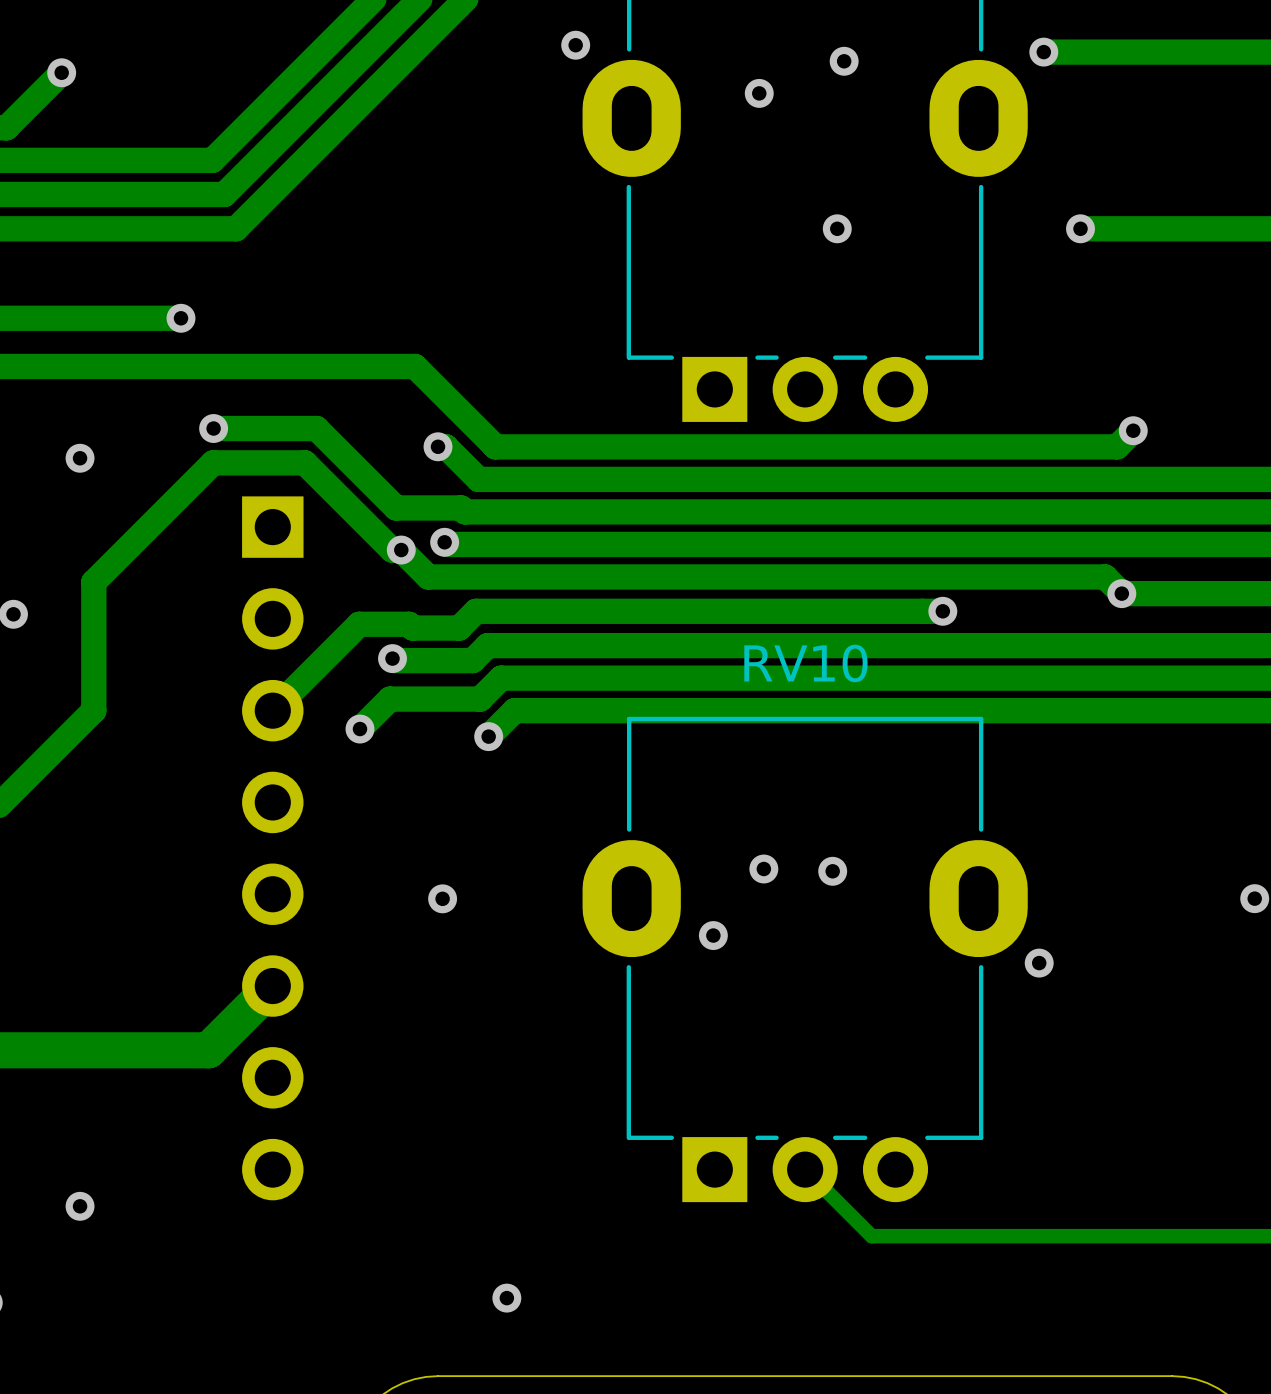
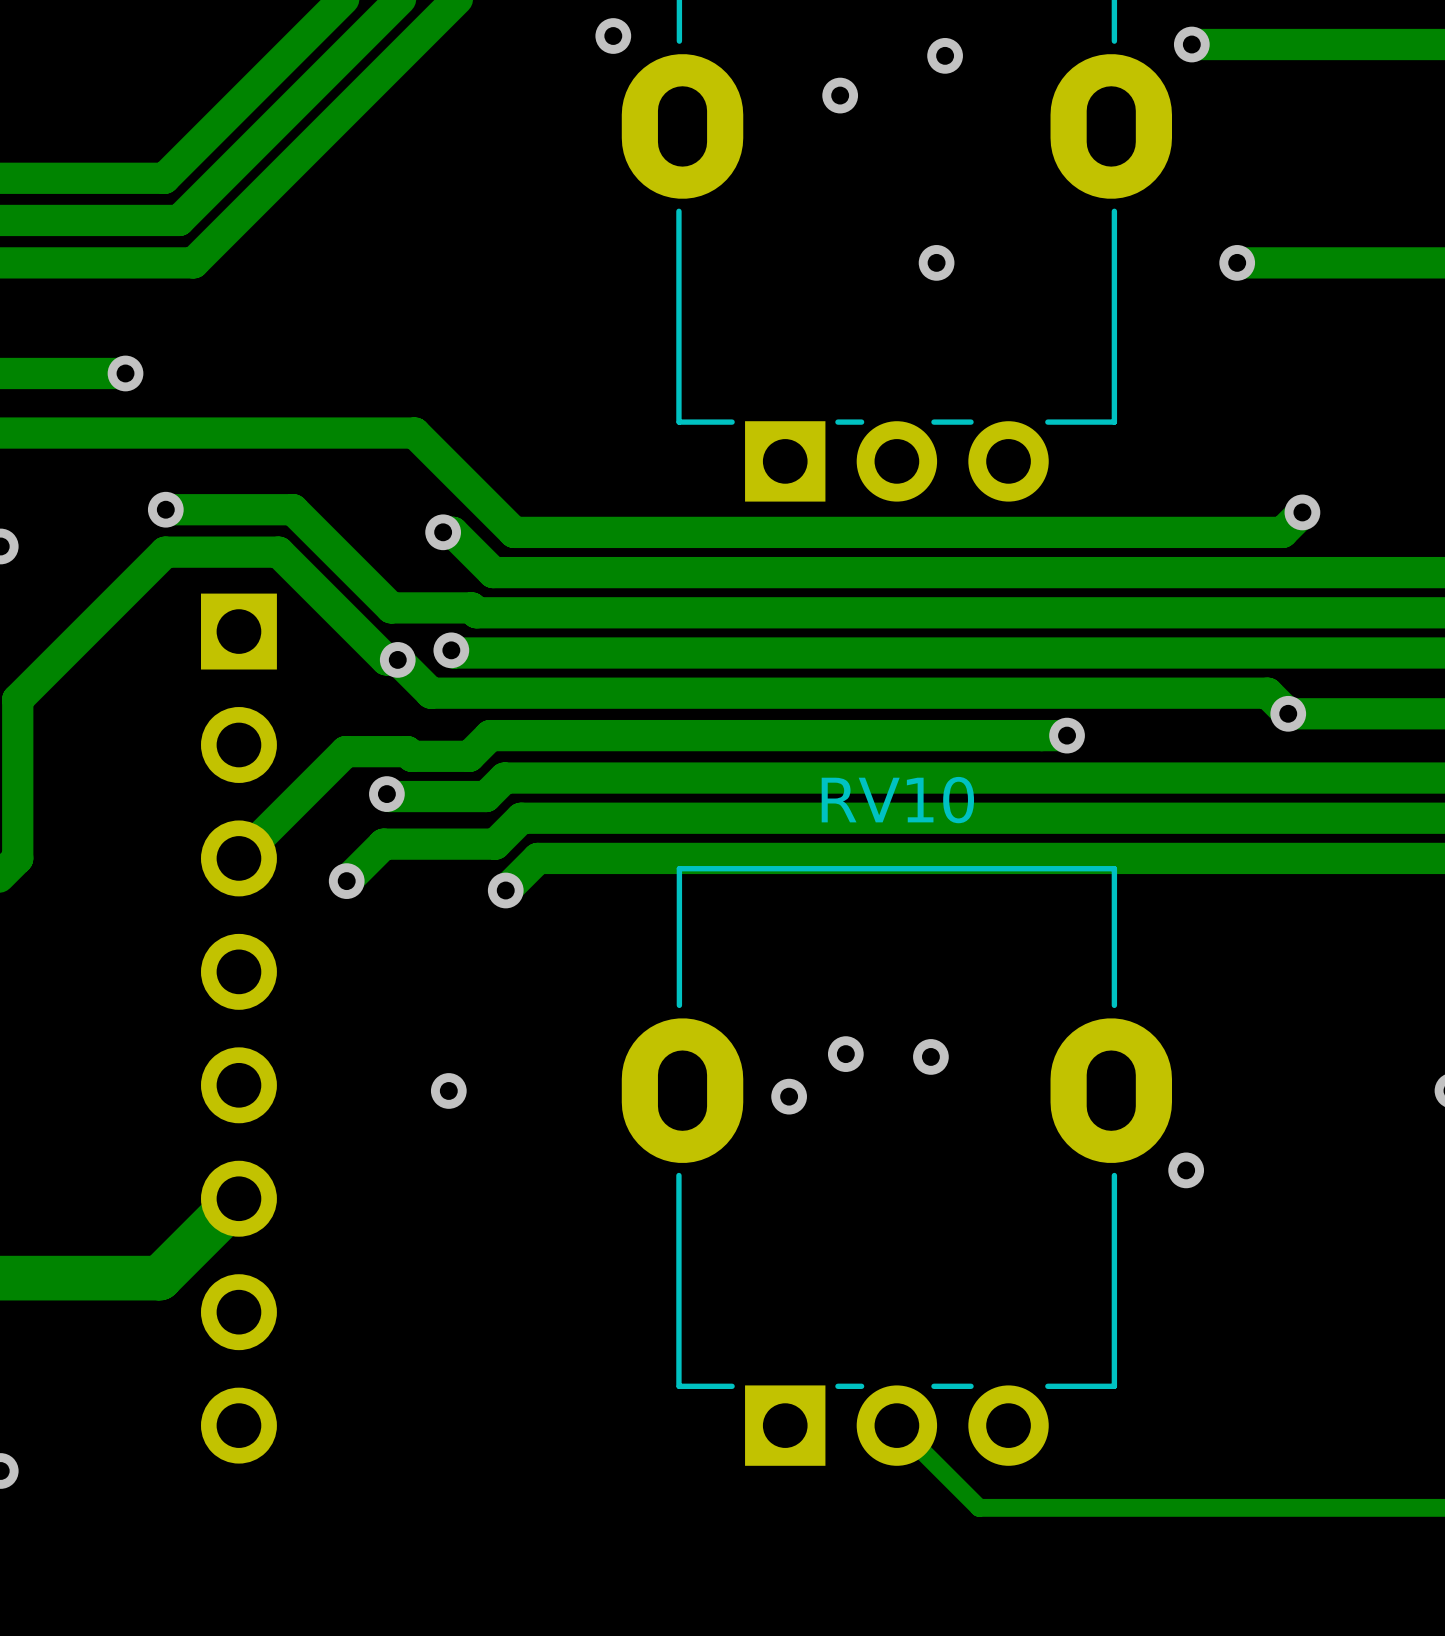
via position: (713, 935) -> (789, 1096)
via: (506, 1298) -> none

